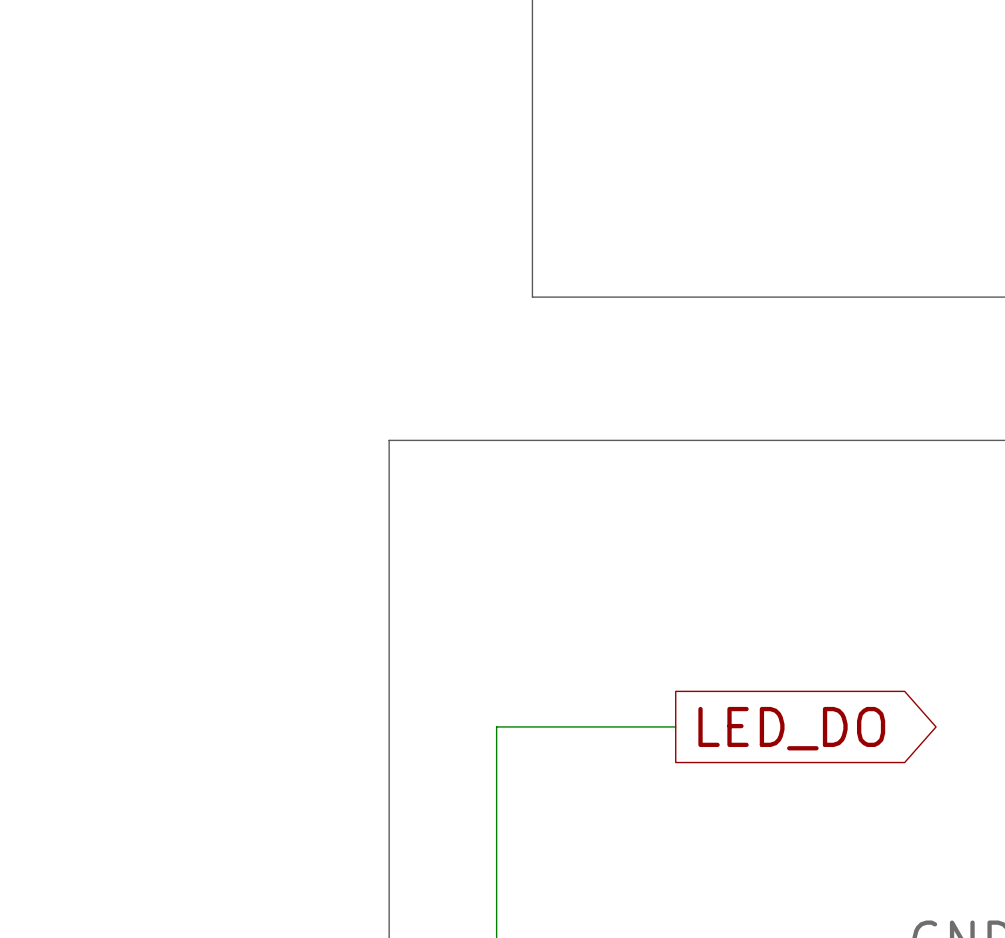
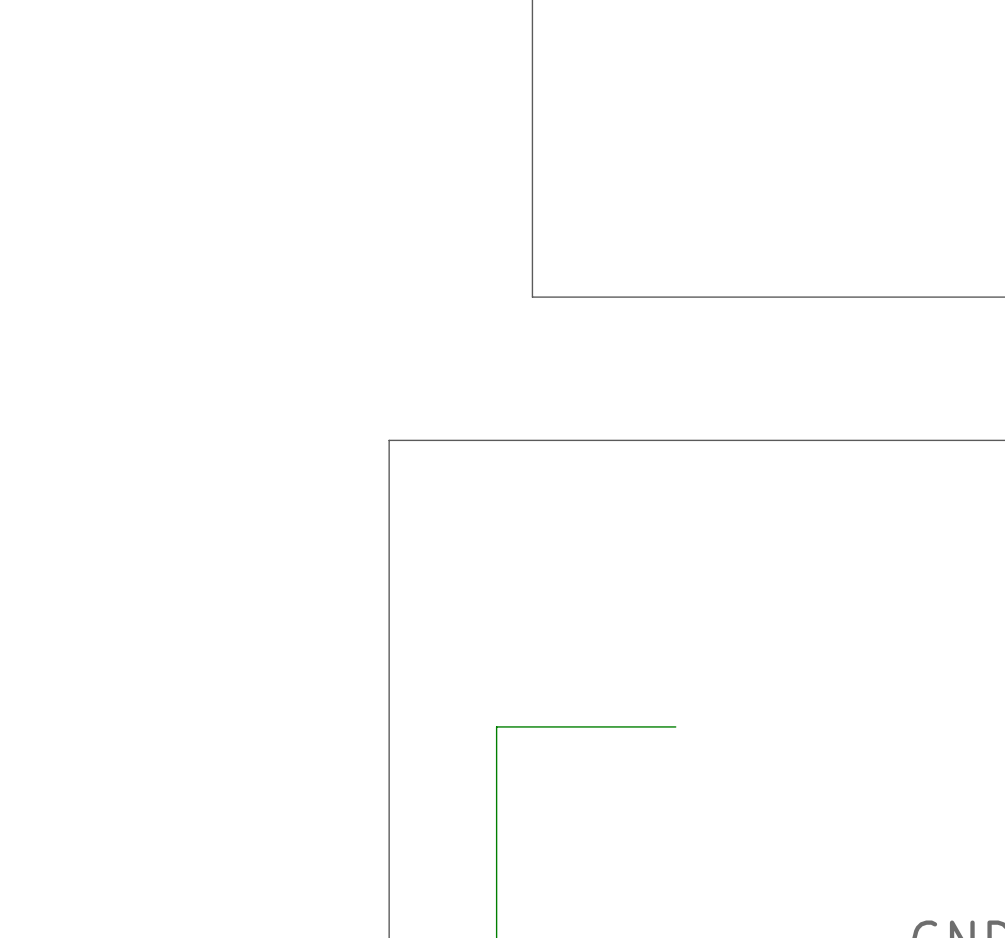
global label: LED_DO (791, 728) -> none

